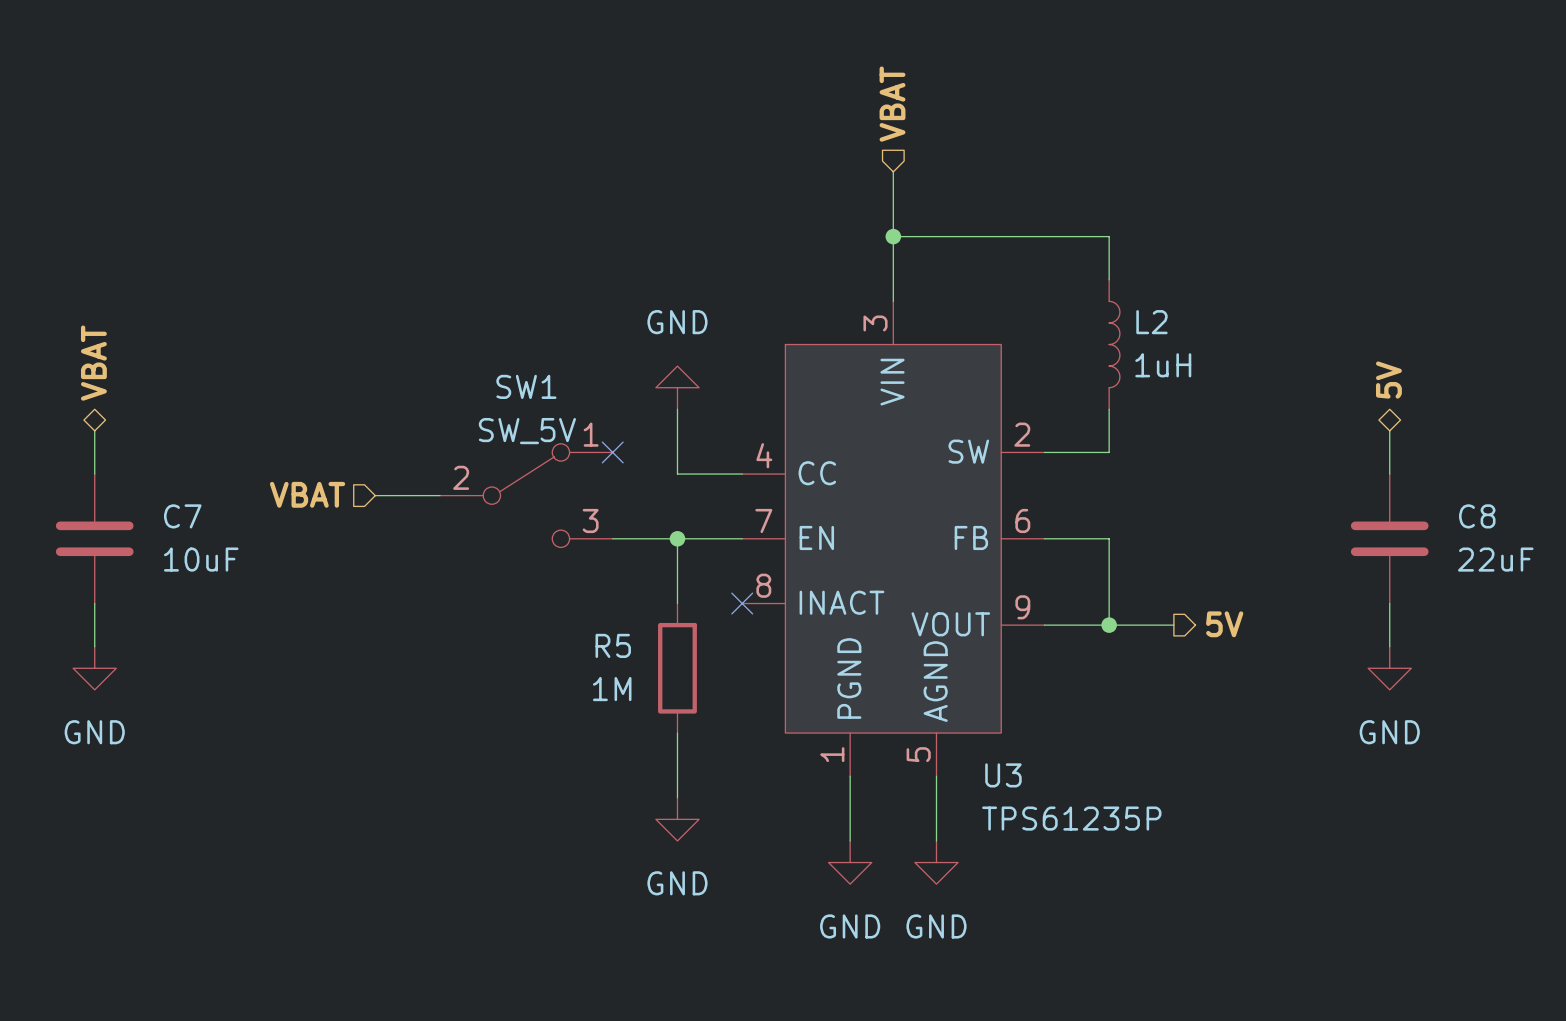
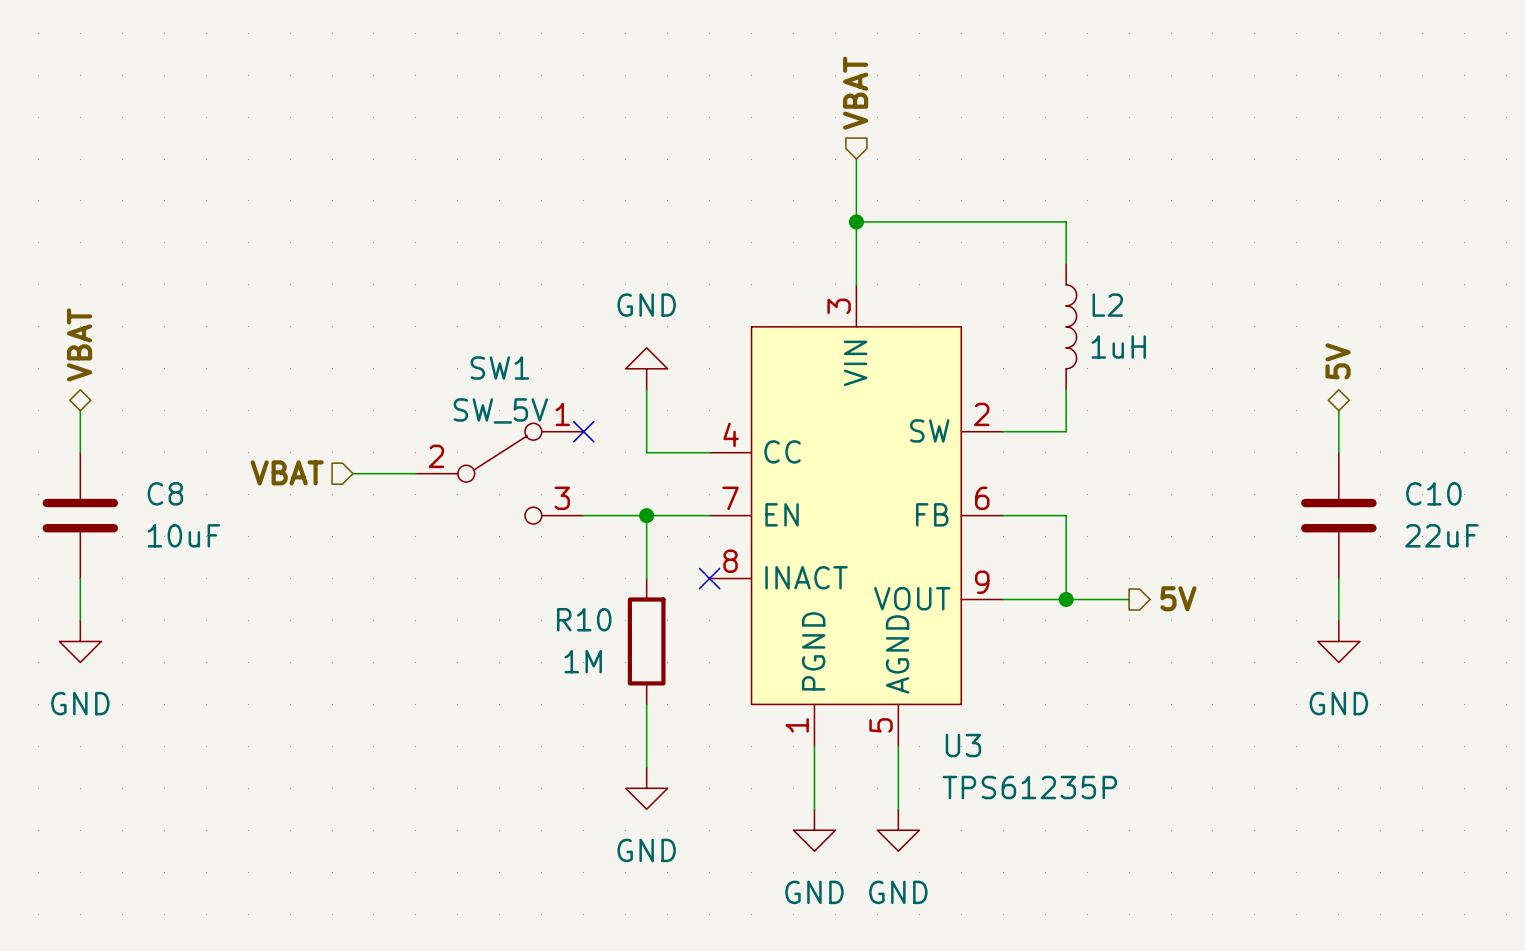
C7 name: C7 (182, 516) -> C8 (165, 493)
C8 name: C8 (1477, 516) -> C10 (1433, 493)
R5 name: R5 (613, 645) -> R10 (584, 619)

